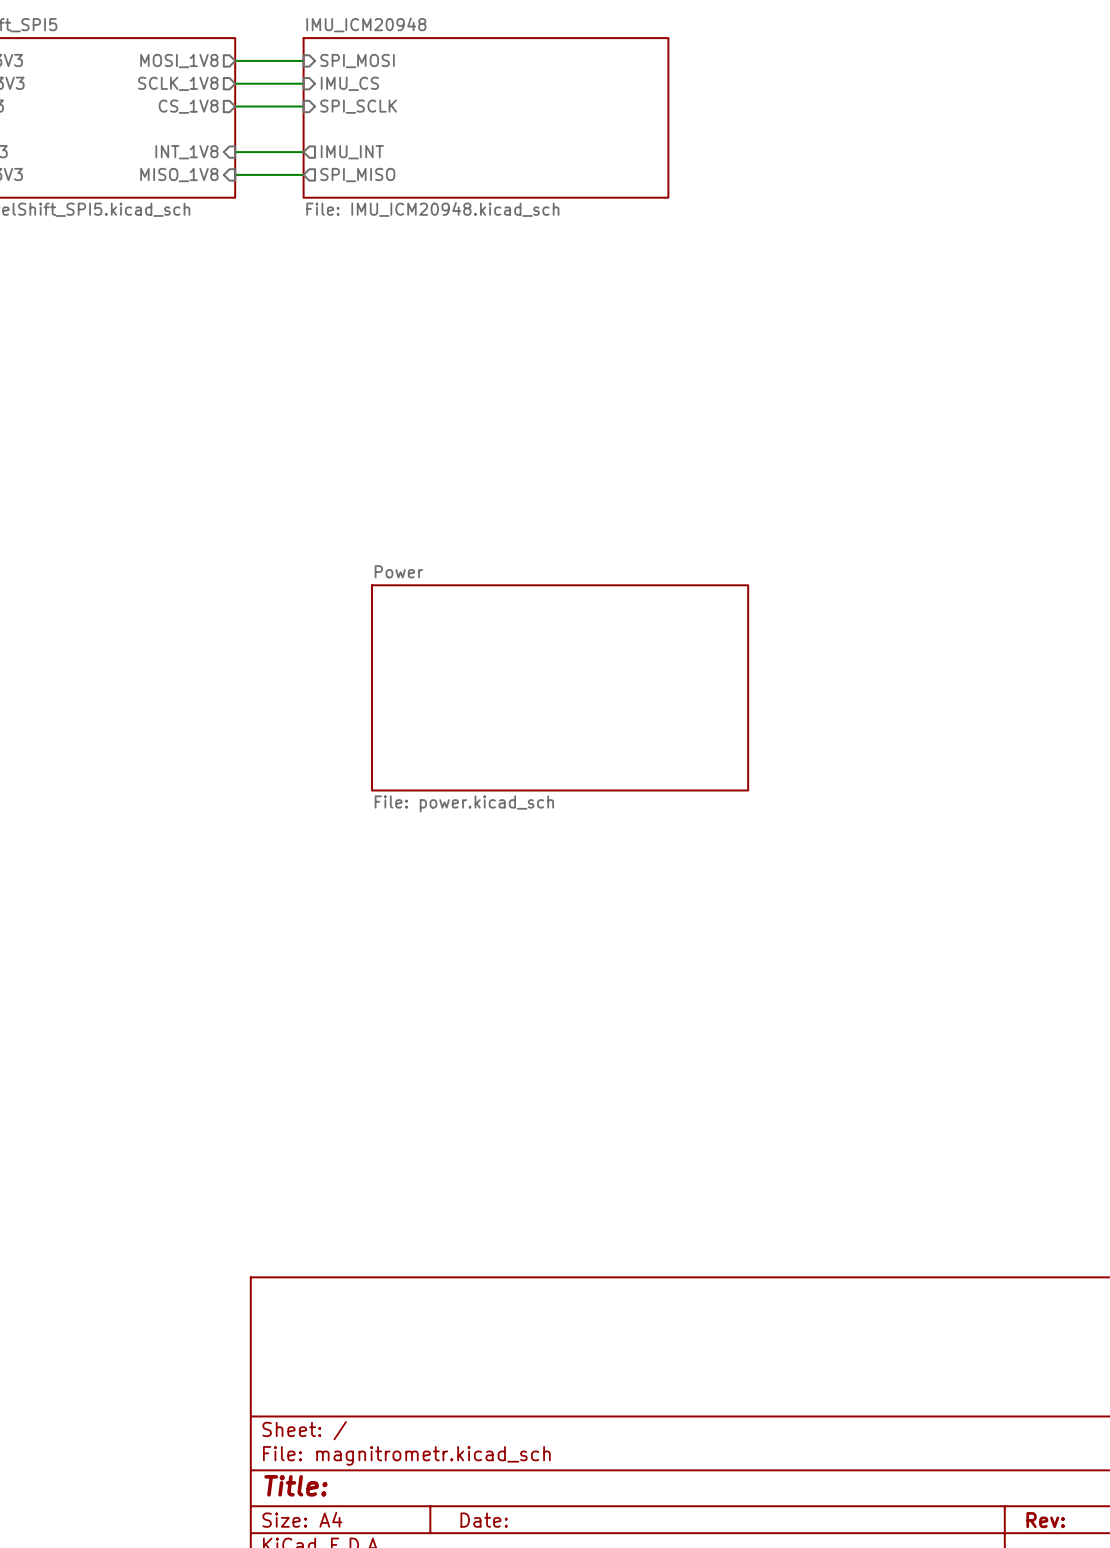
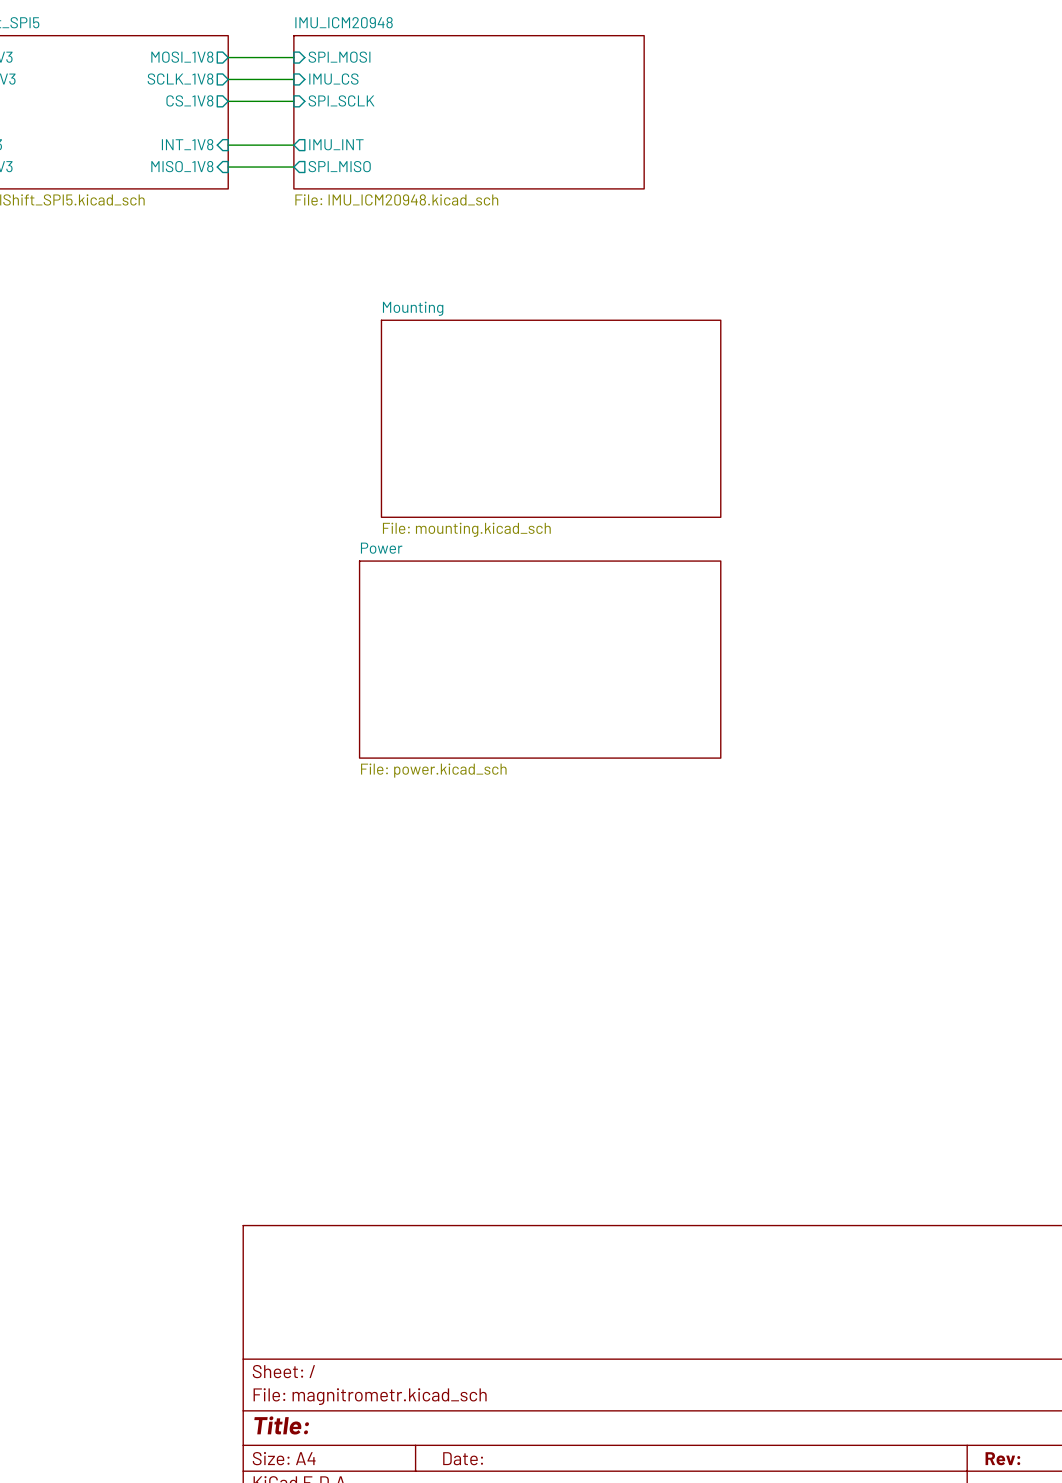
sheet Mounting: none -> File: mounting.kicad_sch (551, 418)

